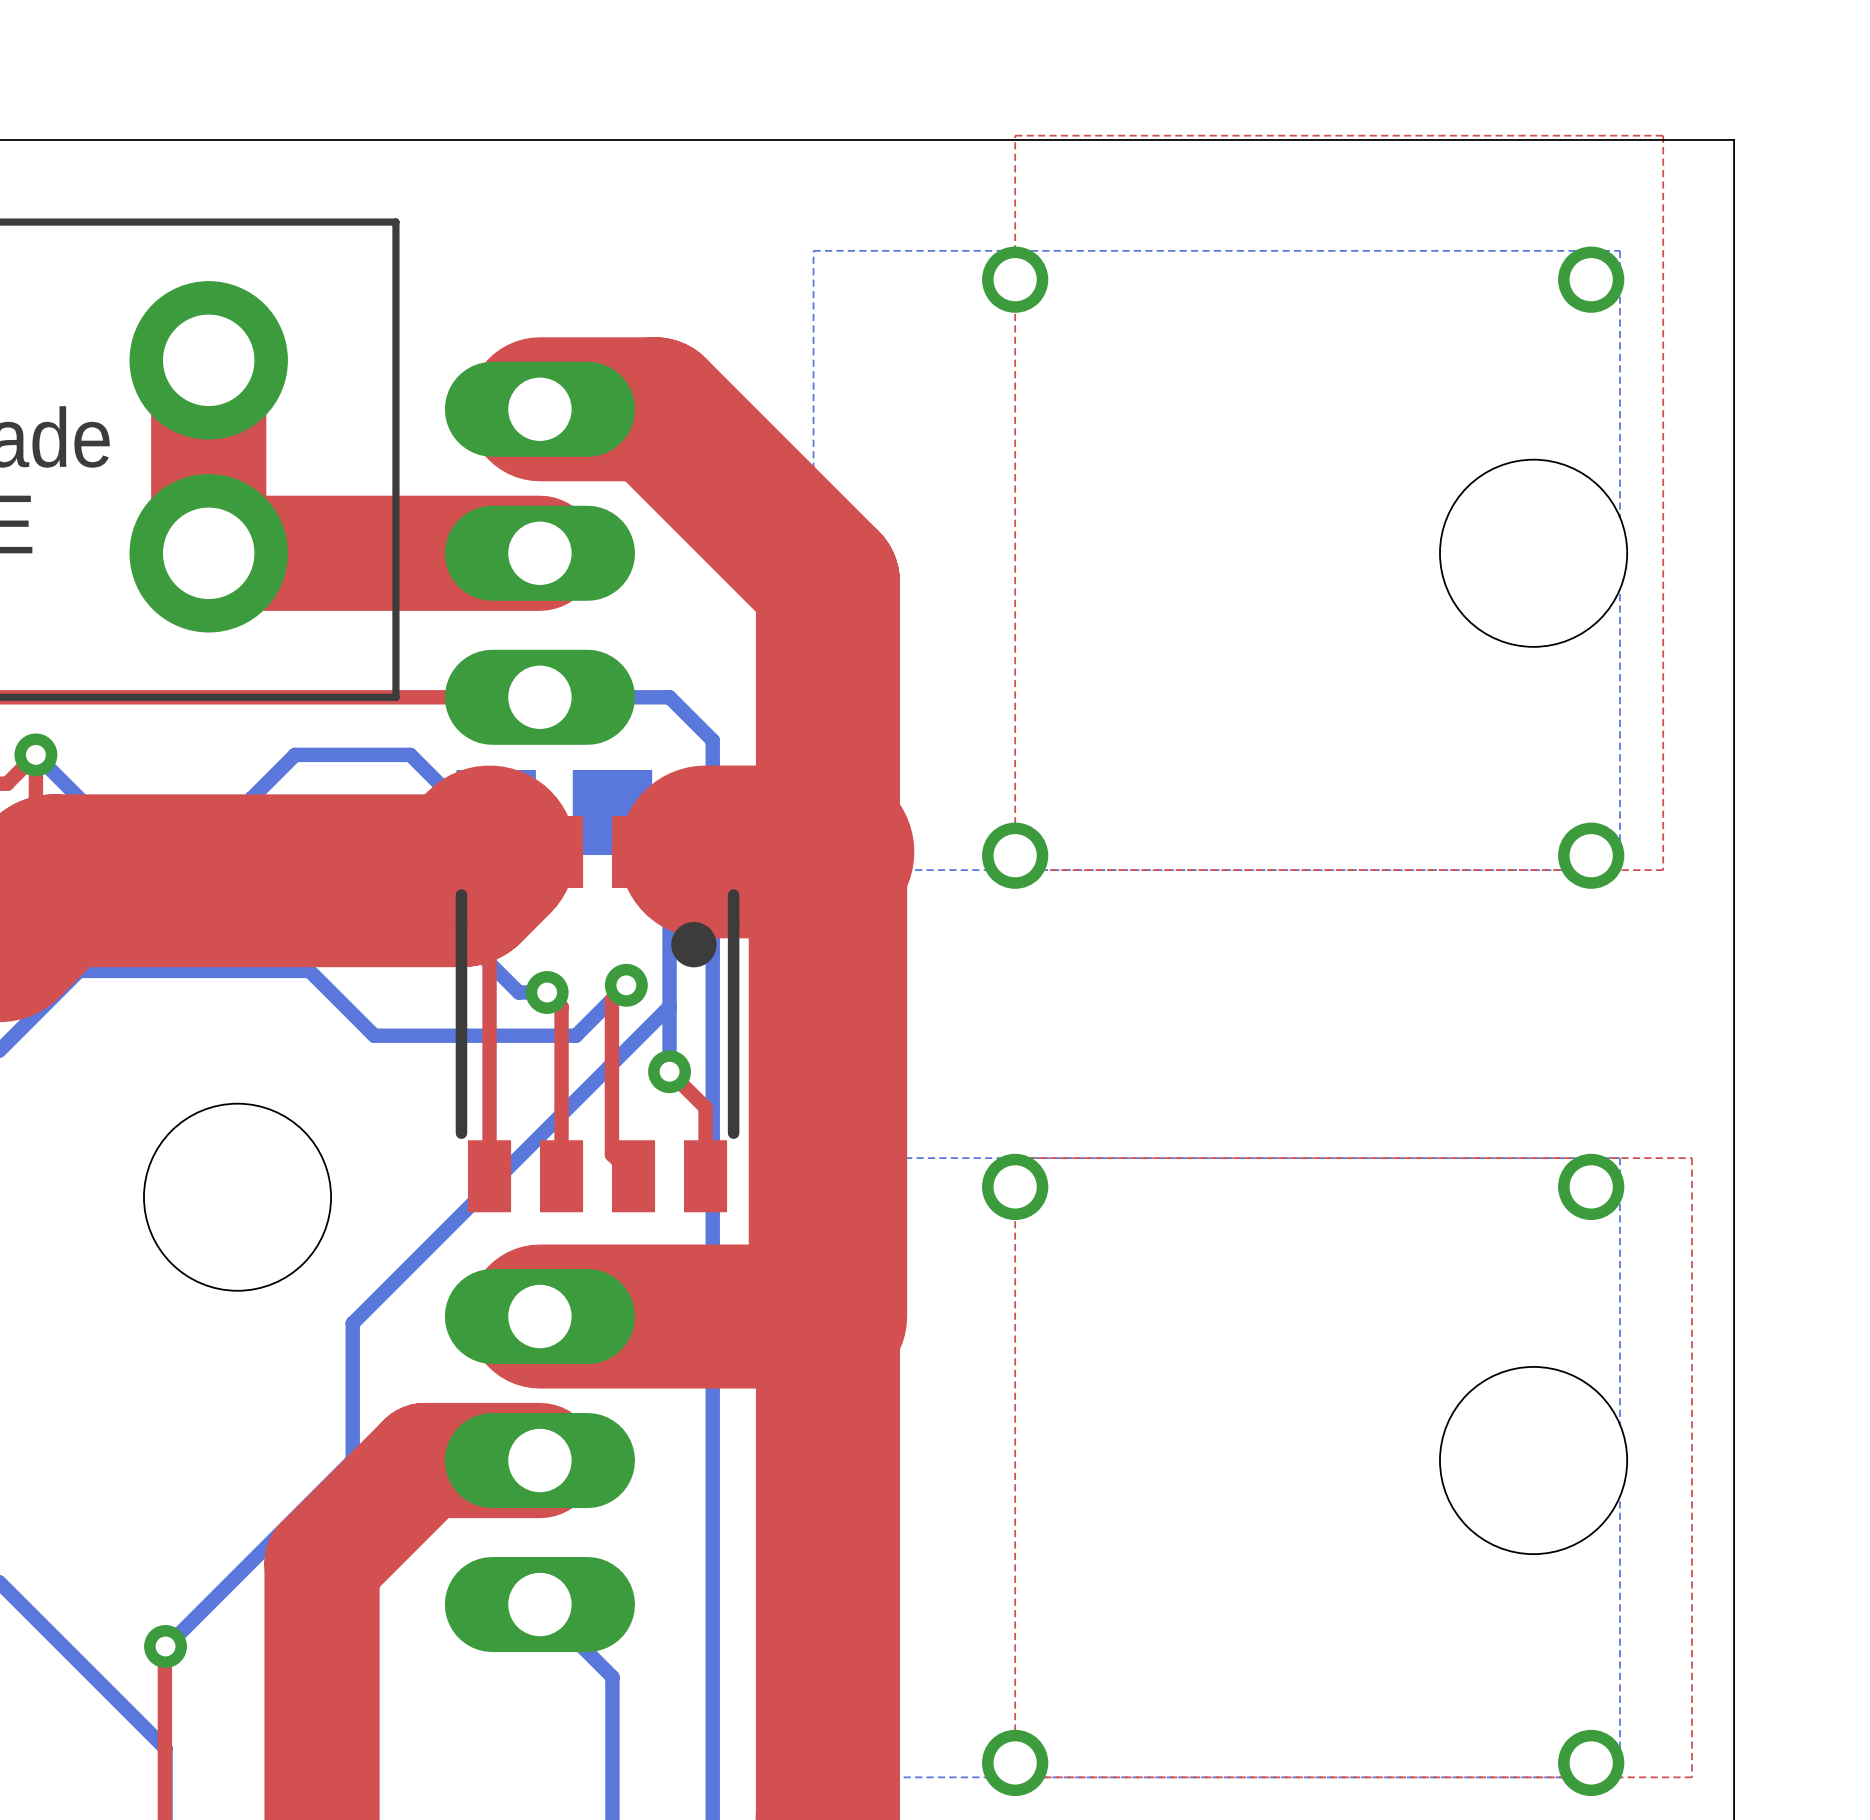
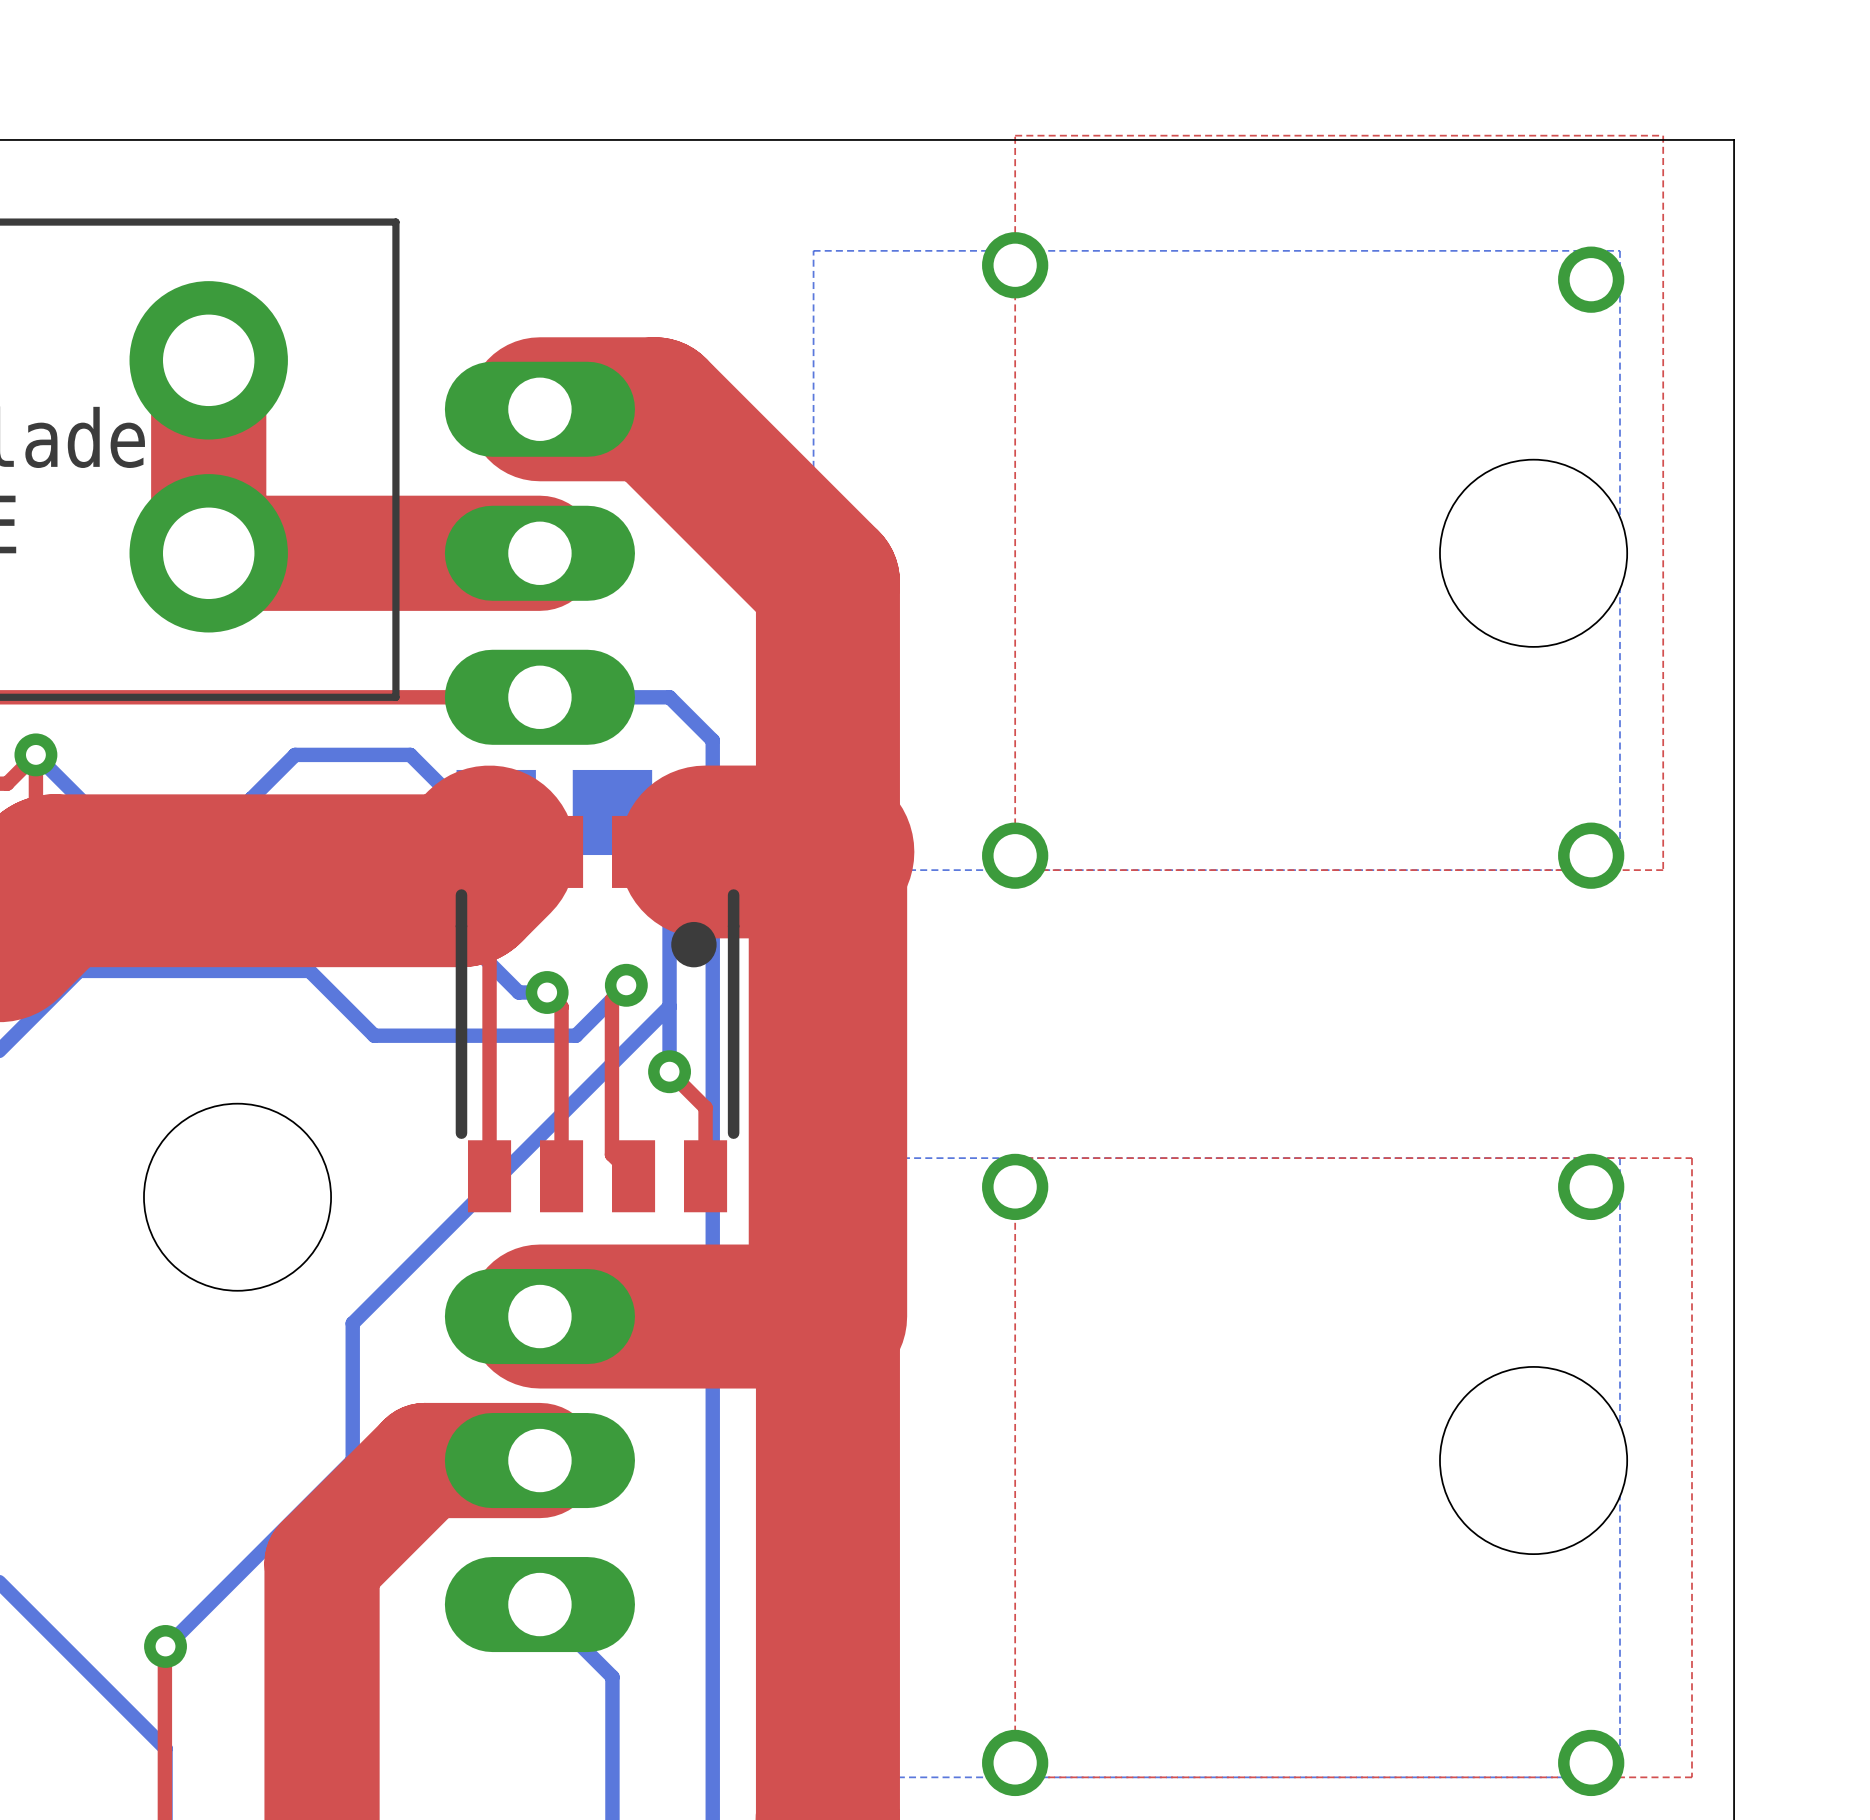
via position: (1015, 279) -> (1015, 265)

